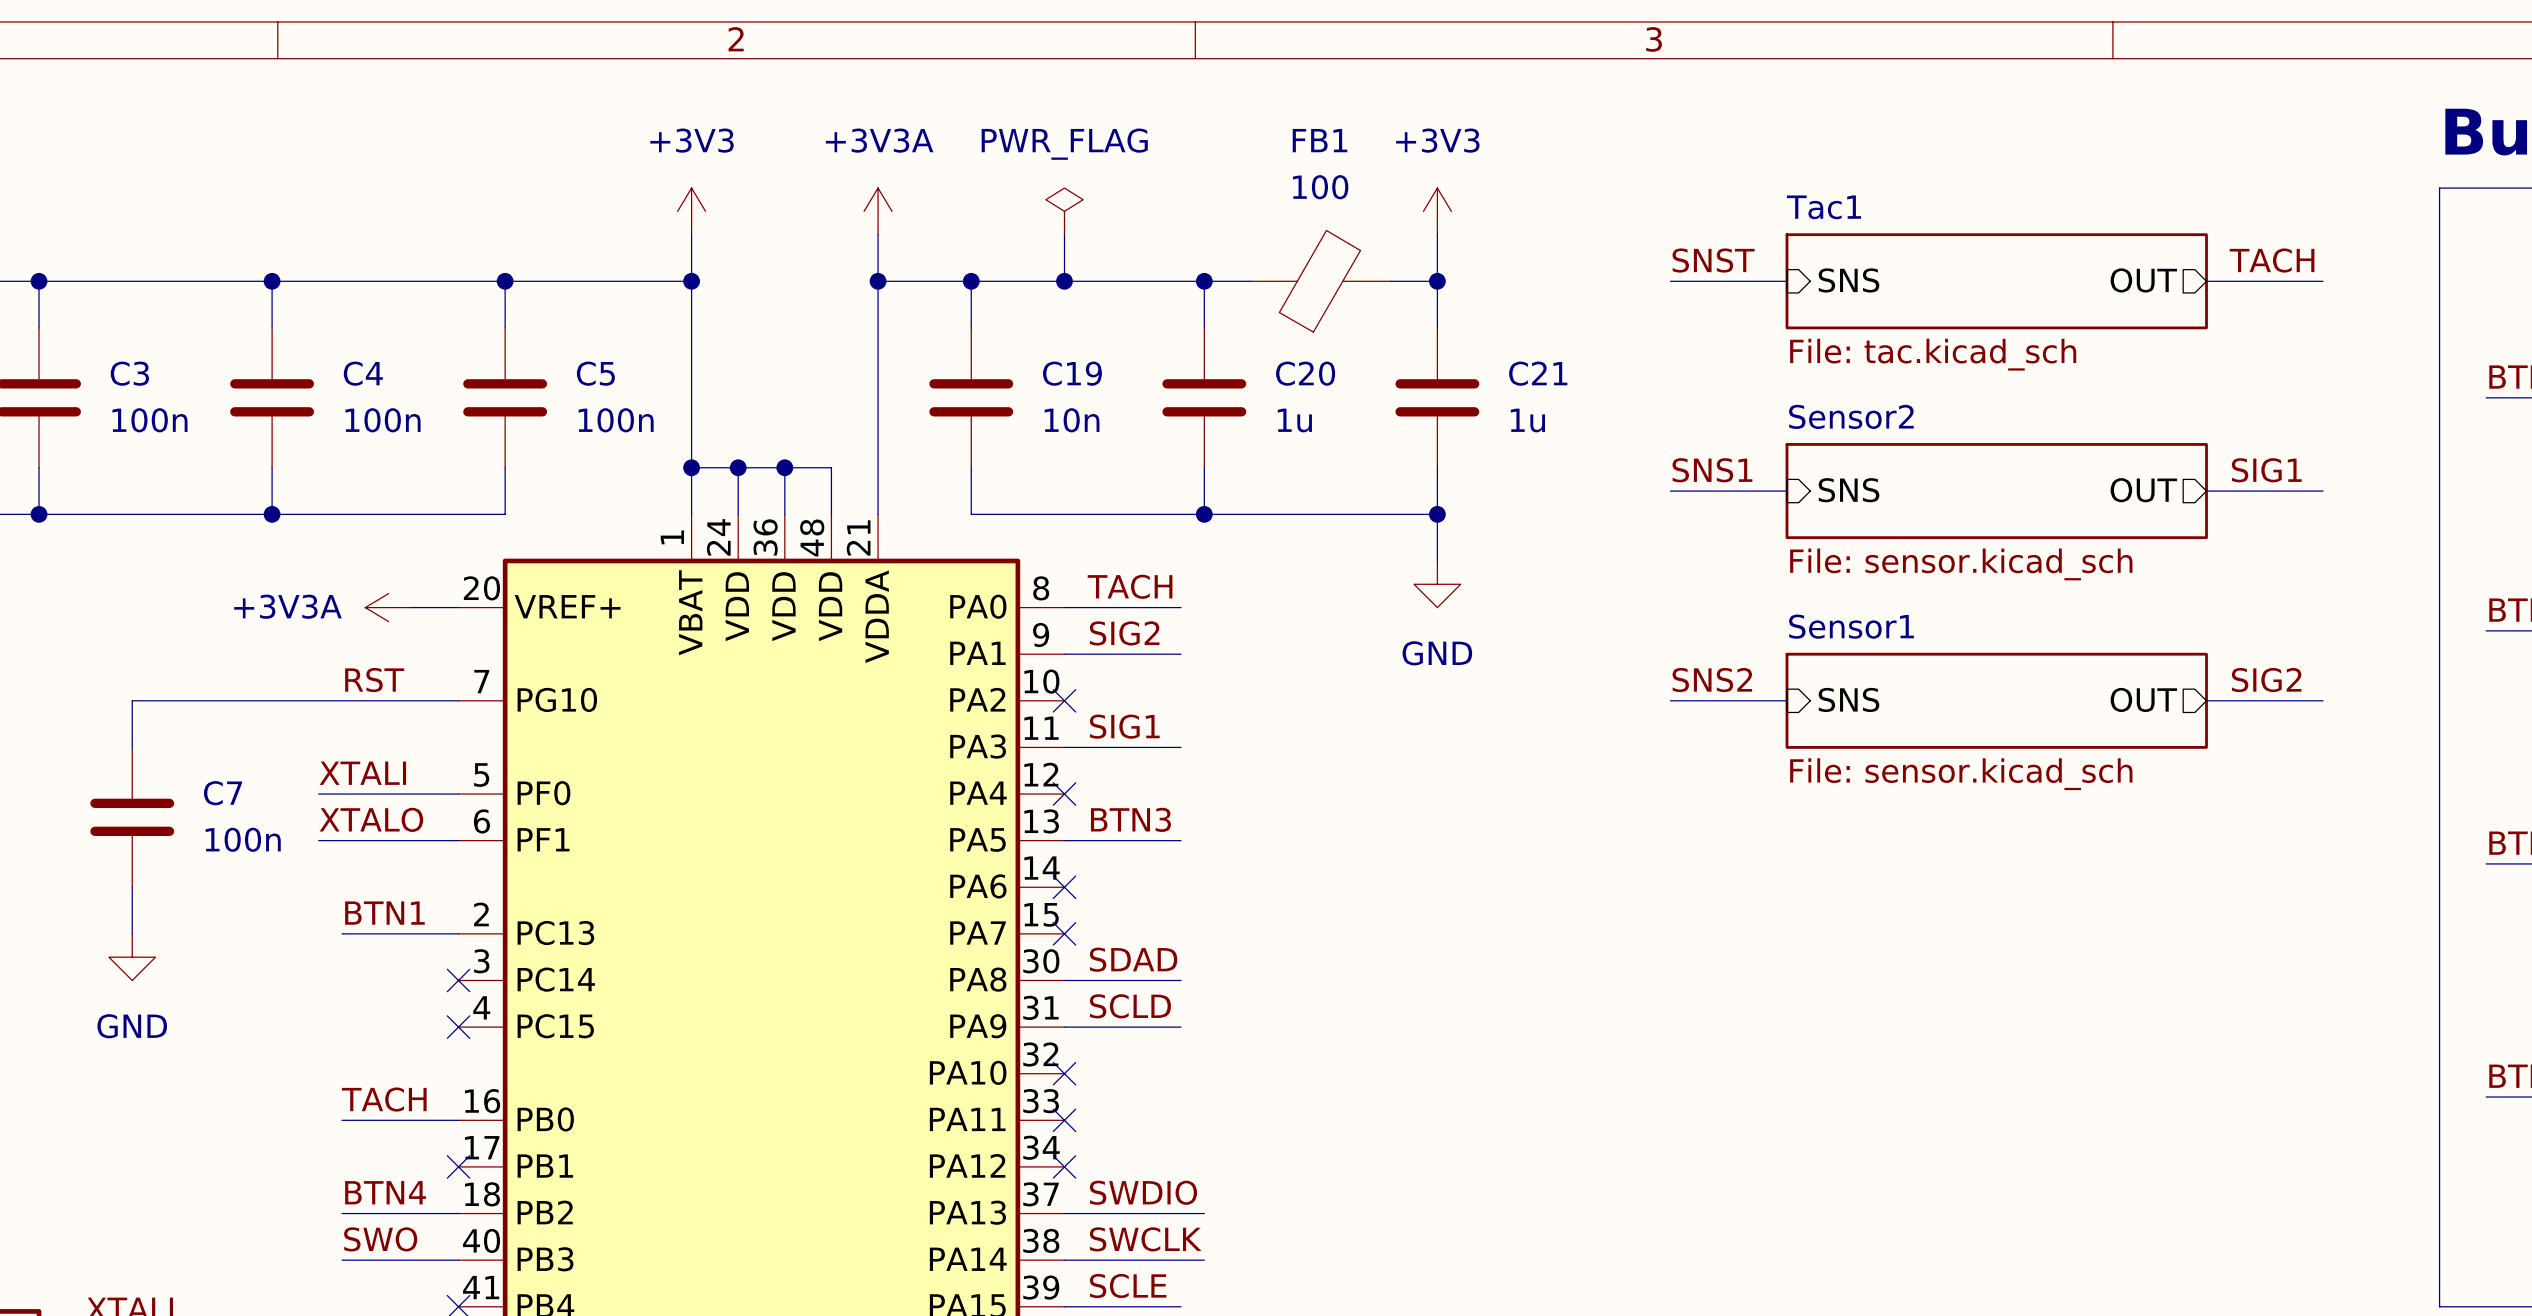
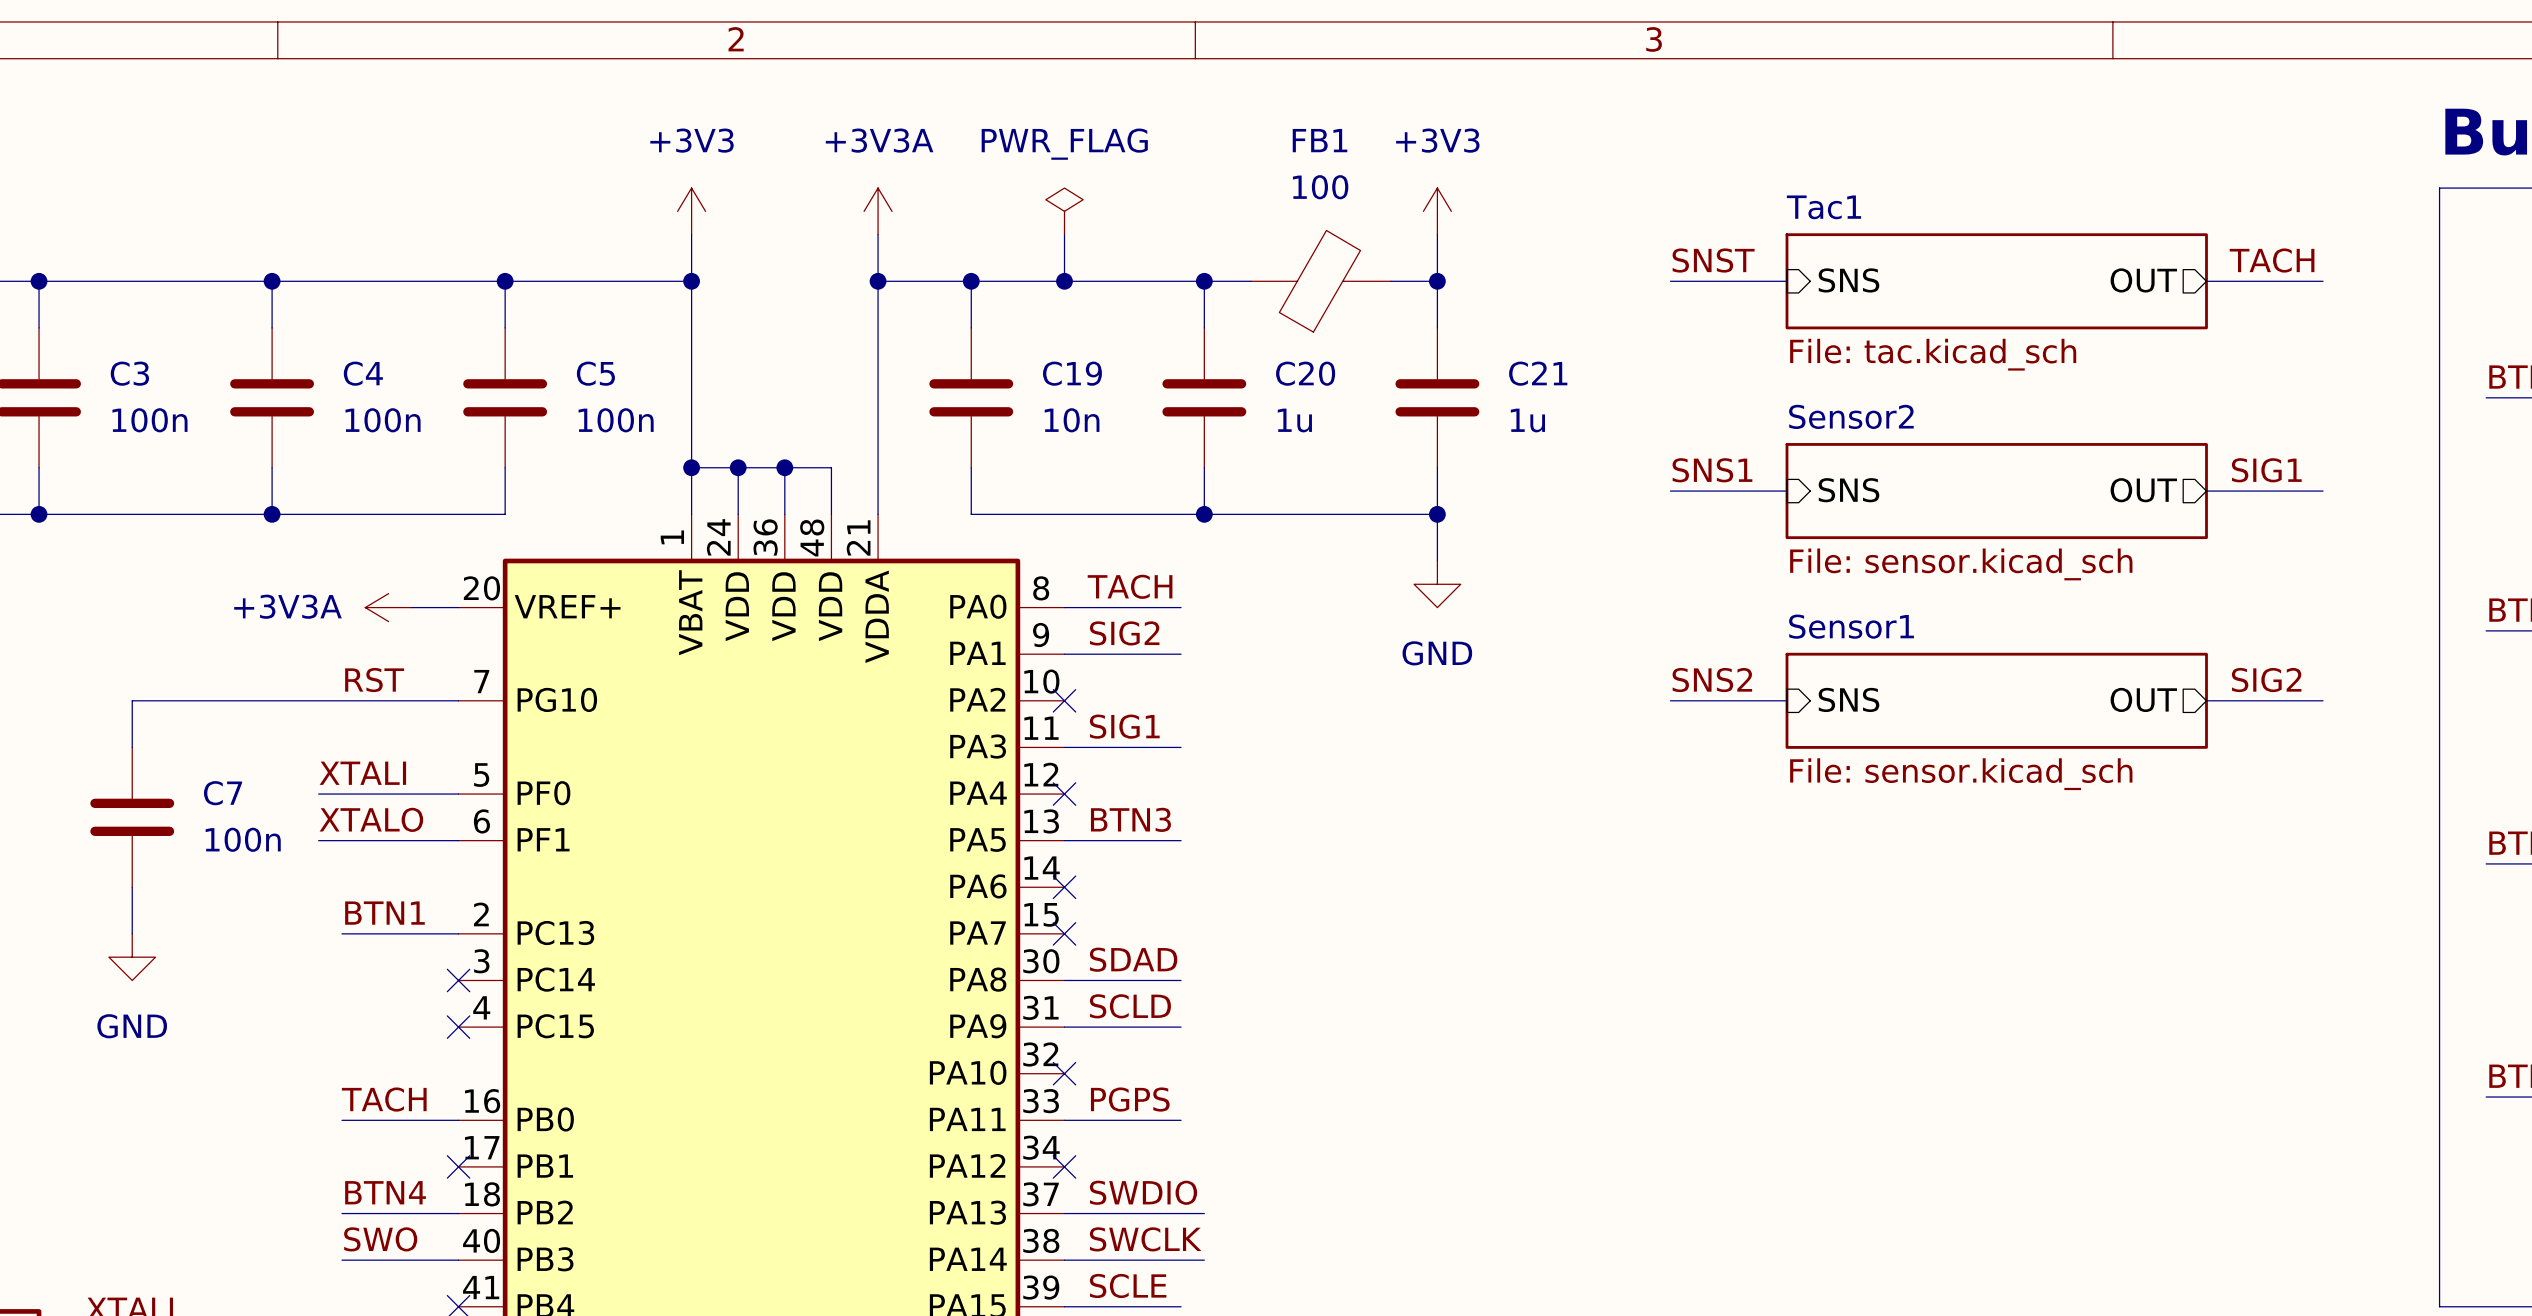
label: none -> PGPS (1130, 1099)
wire: none -> (1064, 1120) (1181, 1120)
no-connect mark: (1064, 1120) -> none

